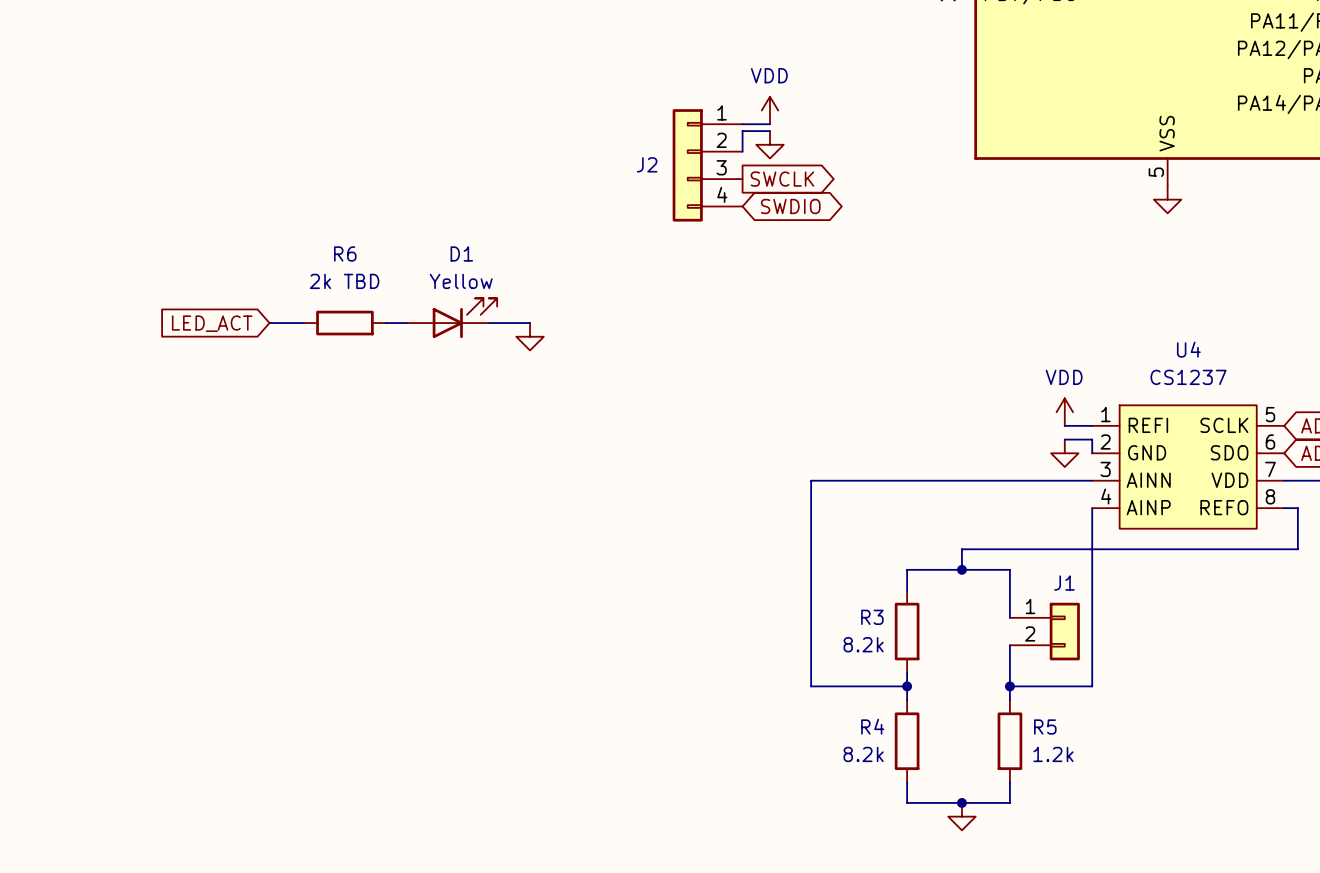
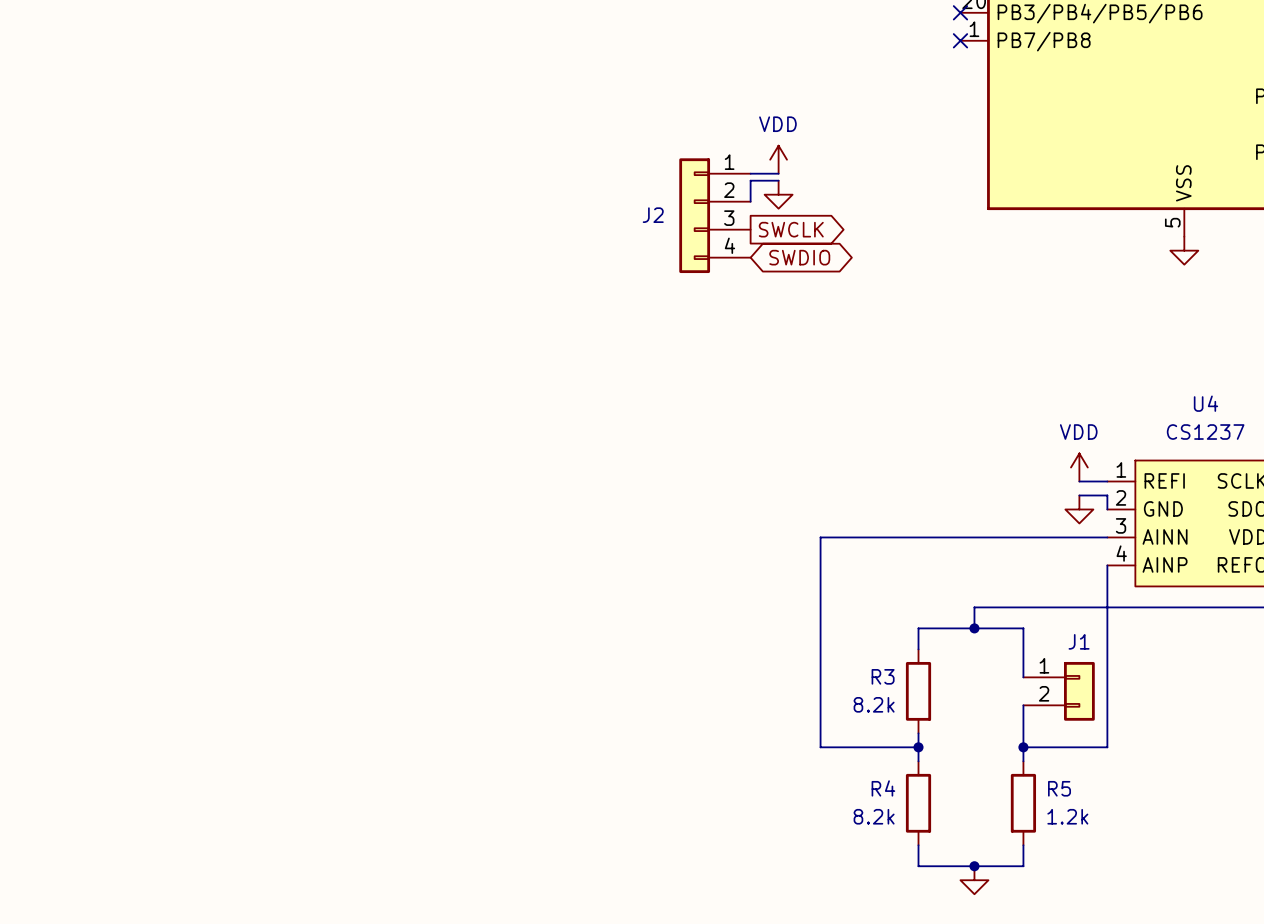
D1: Yellow (451, 318) -> none
global label: LED_ACT (212, 323) -> none
wire: (269, 323) (303, 323) -> none
R6: 2k TBD (344, 323) -> none
wire: (386, 323) (406, 323) -> none
wire: (488, 323) (530, 323) -> none
power symbol: (530, 336) -> none

